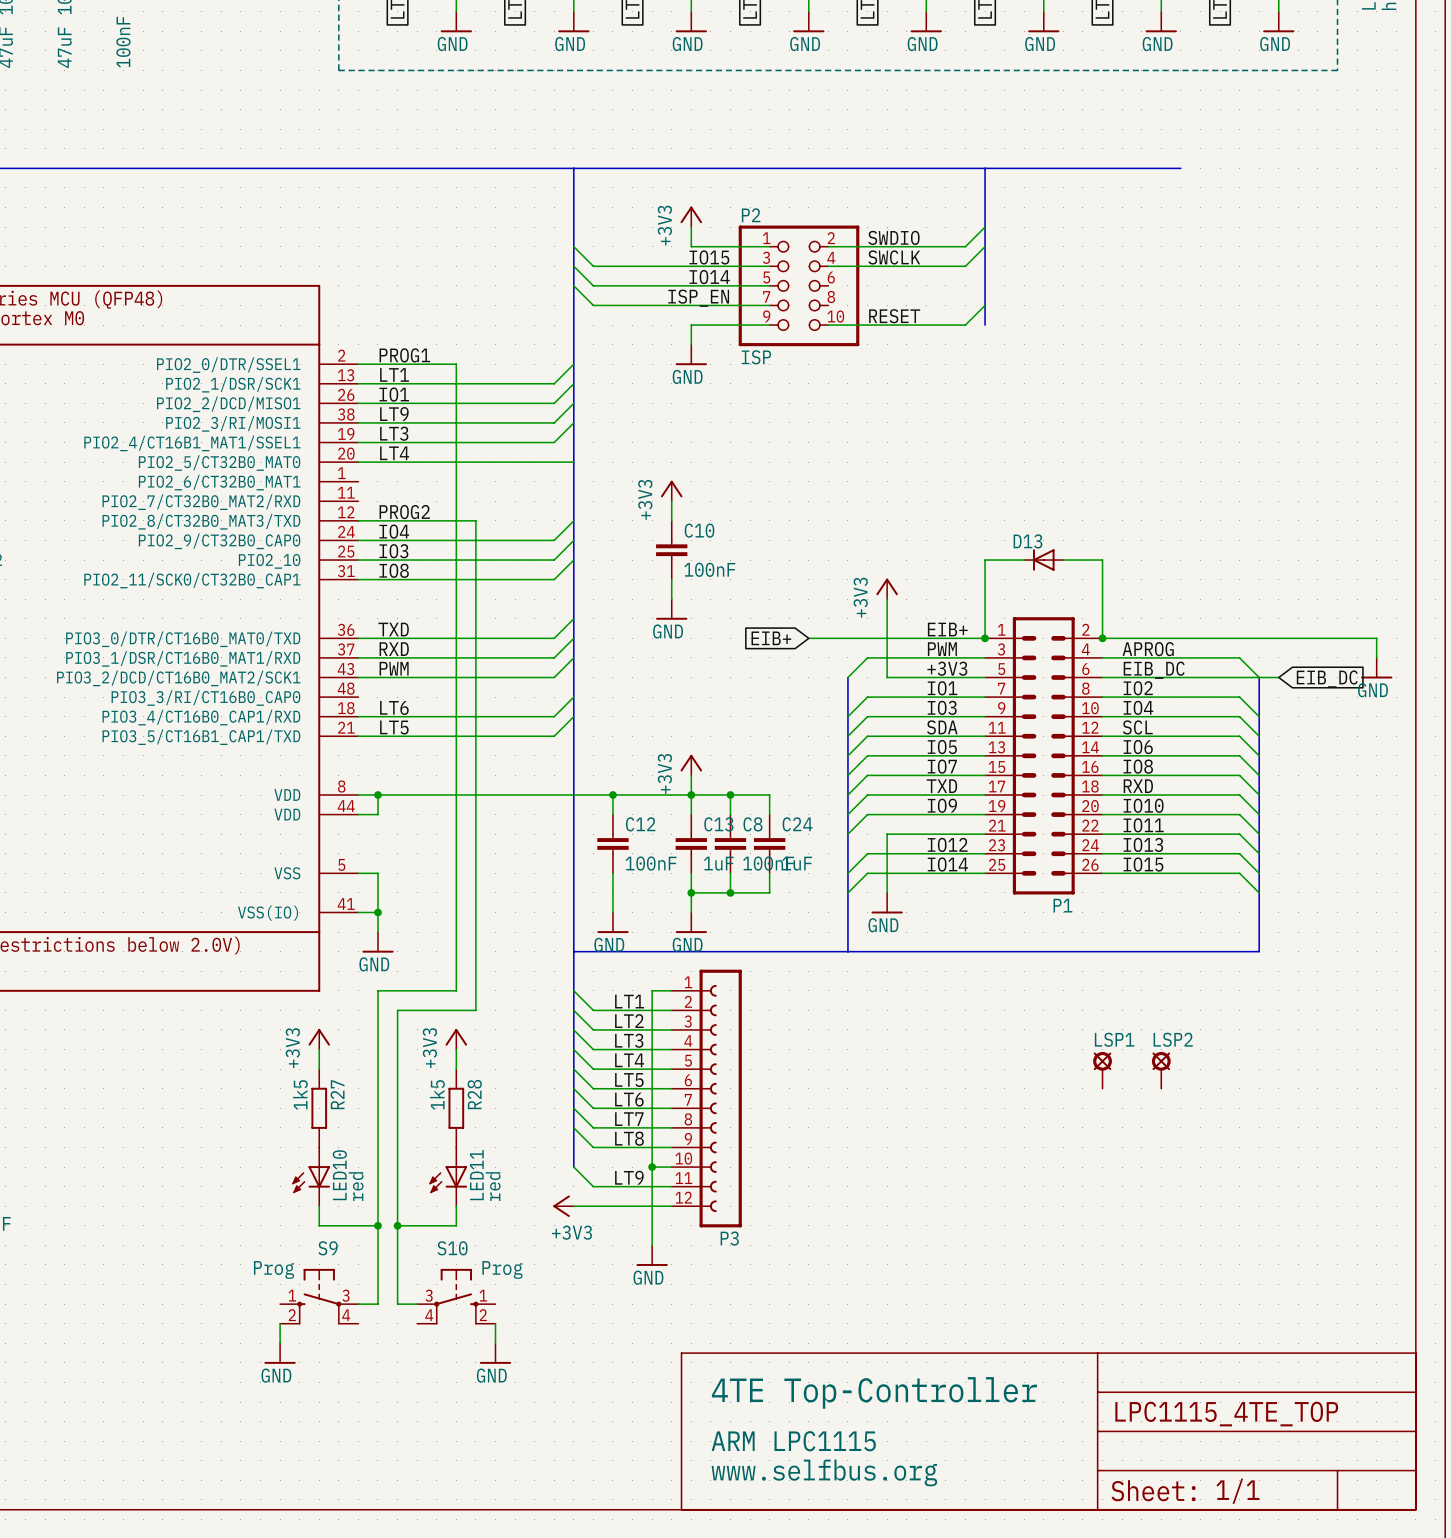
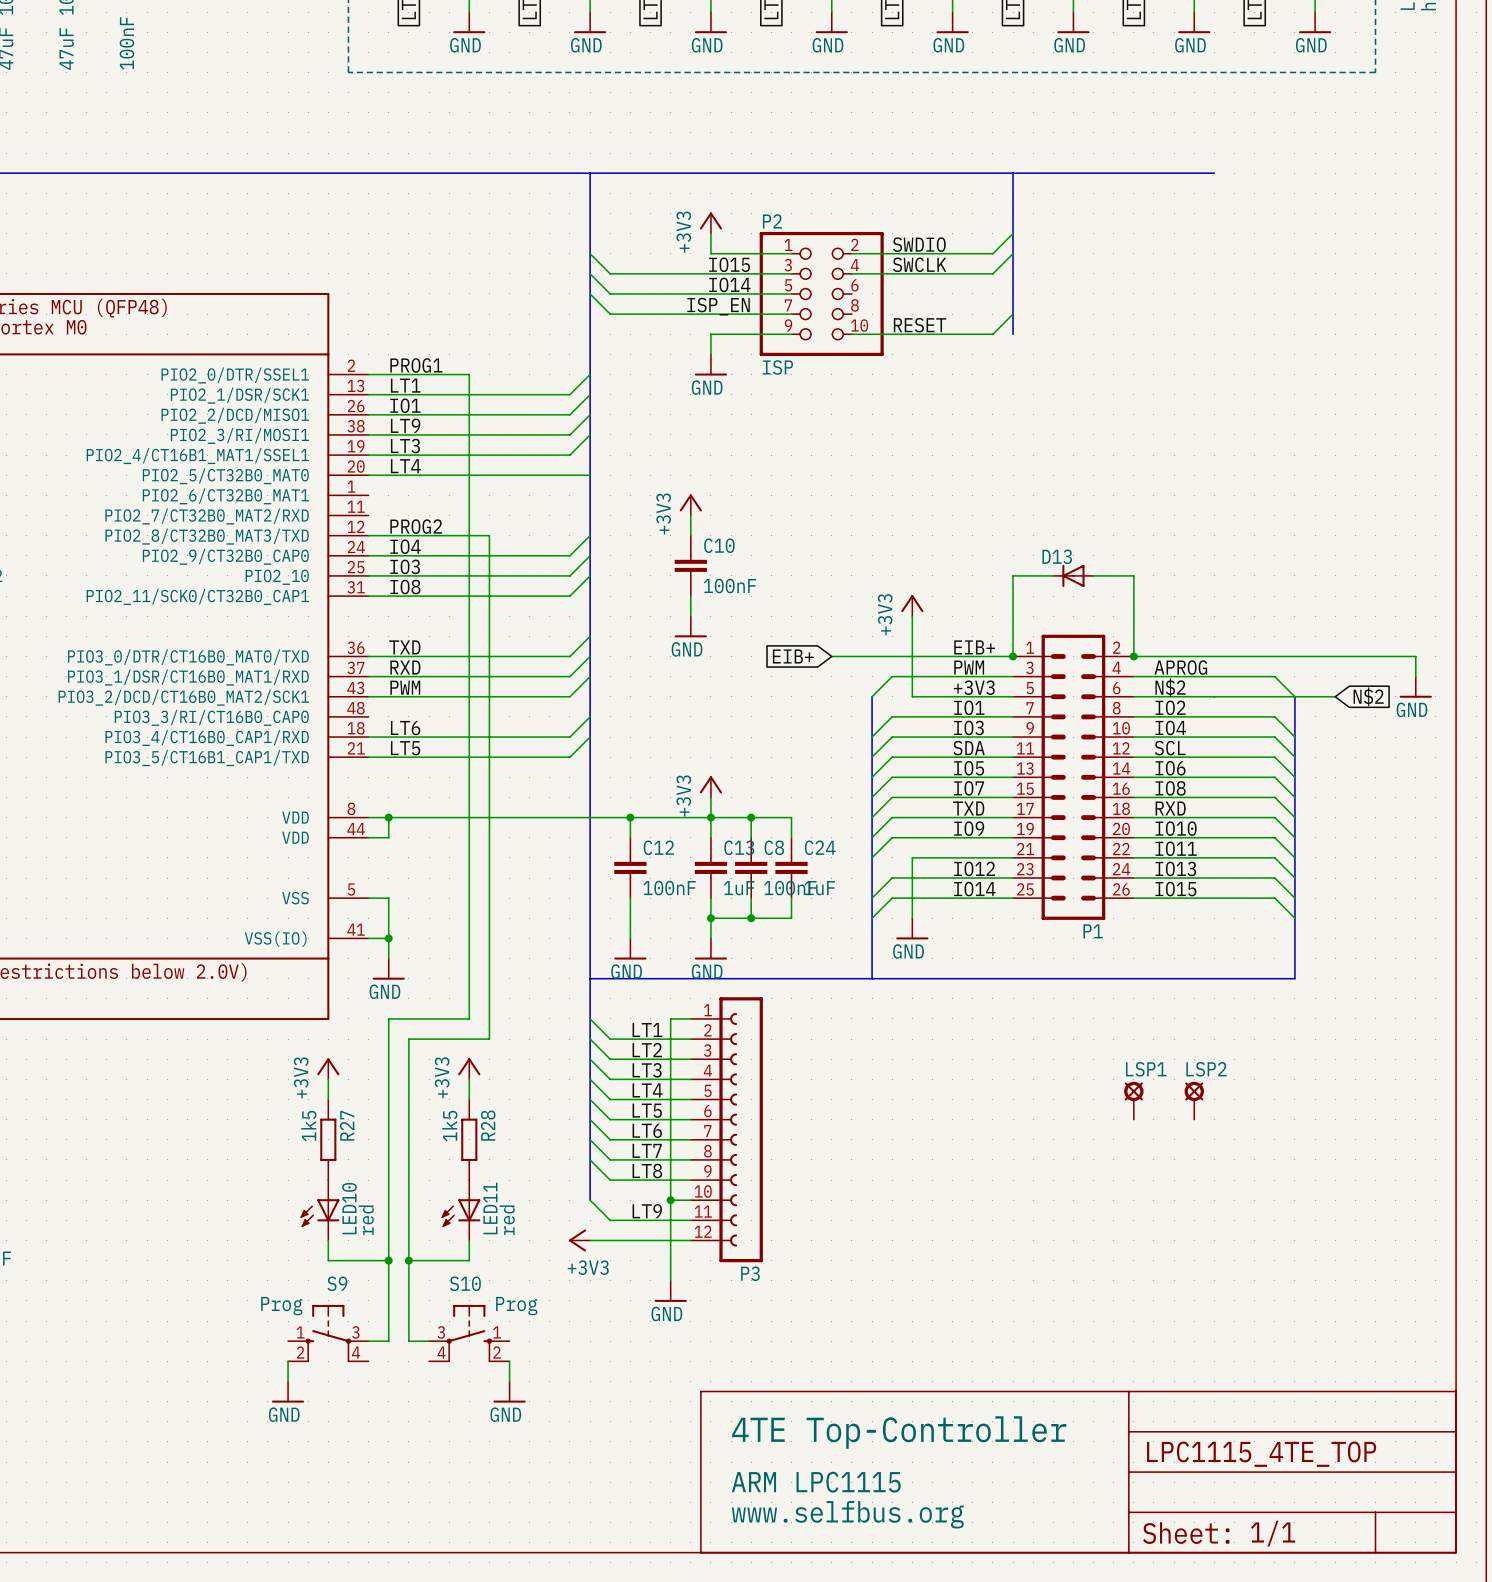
label: EIB_DC (1154, 670) -> N$2 (1170, 687)
wire: none -> (1315, 696) (1335, 696)
global label: none -> N$2 (1368, 696)
global label: EIB_DC (1327, 679) -> none

